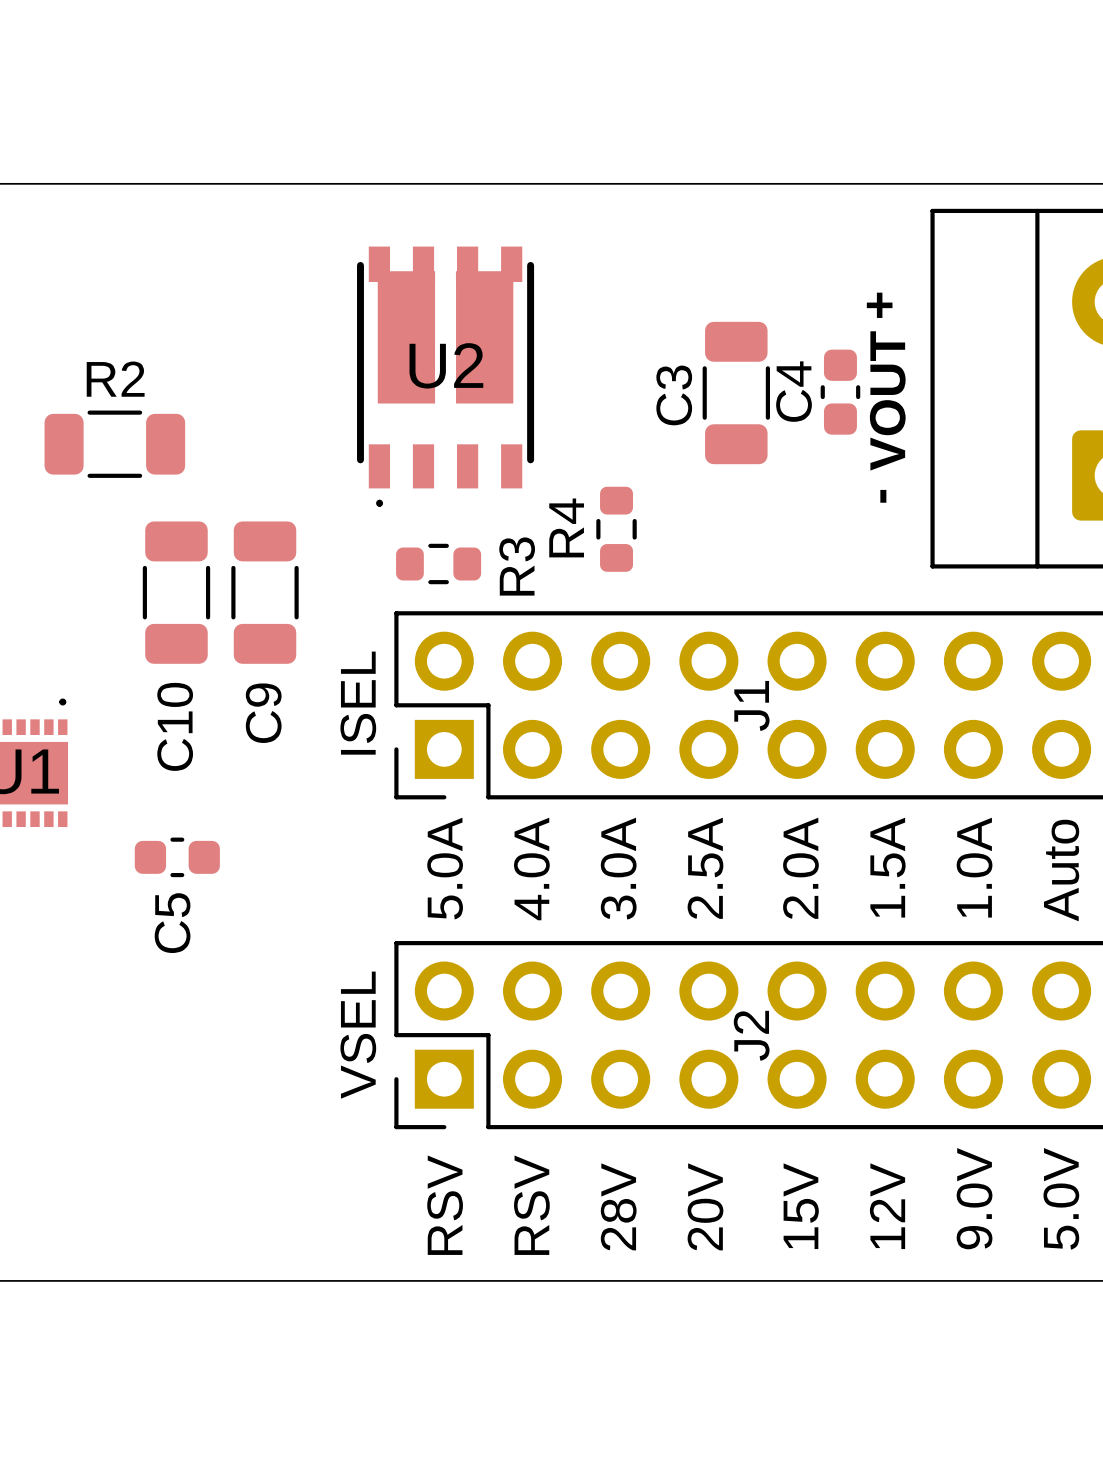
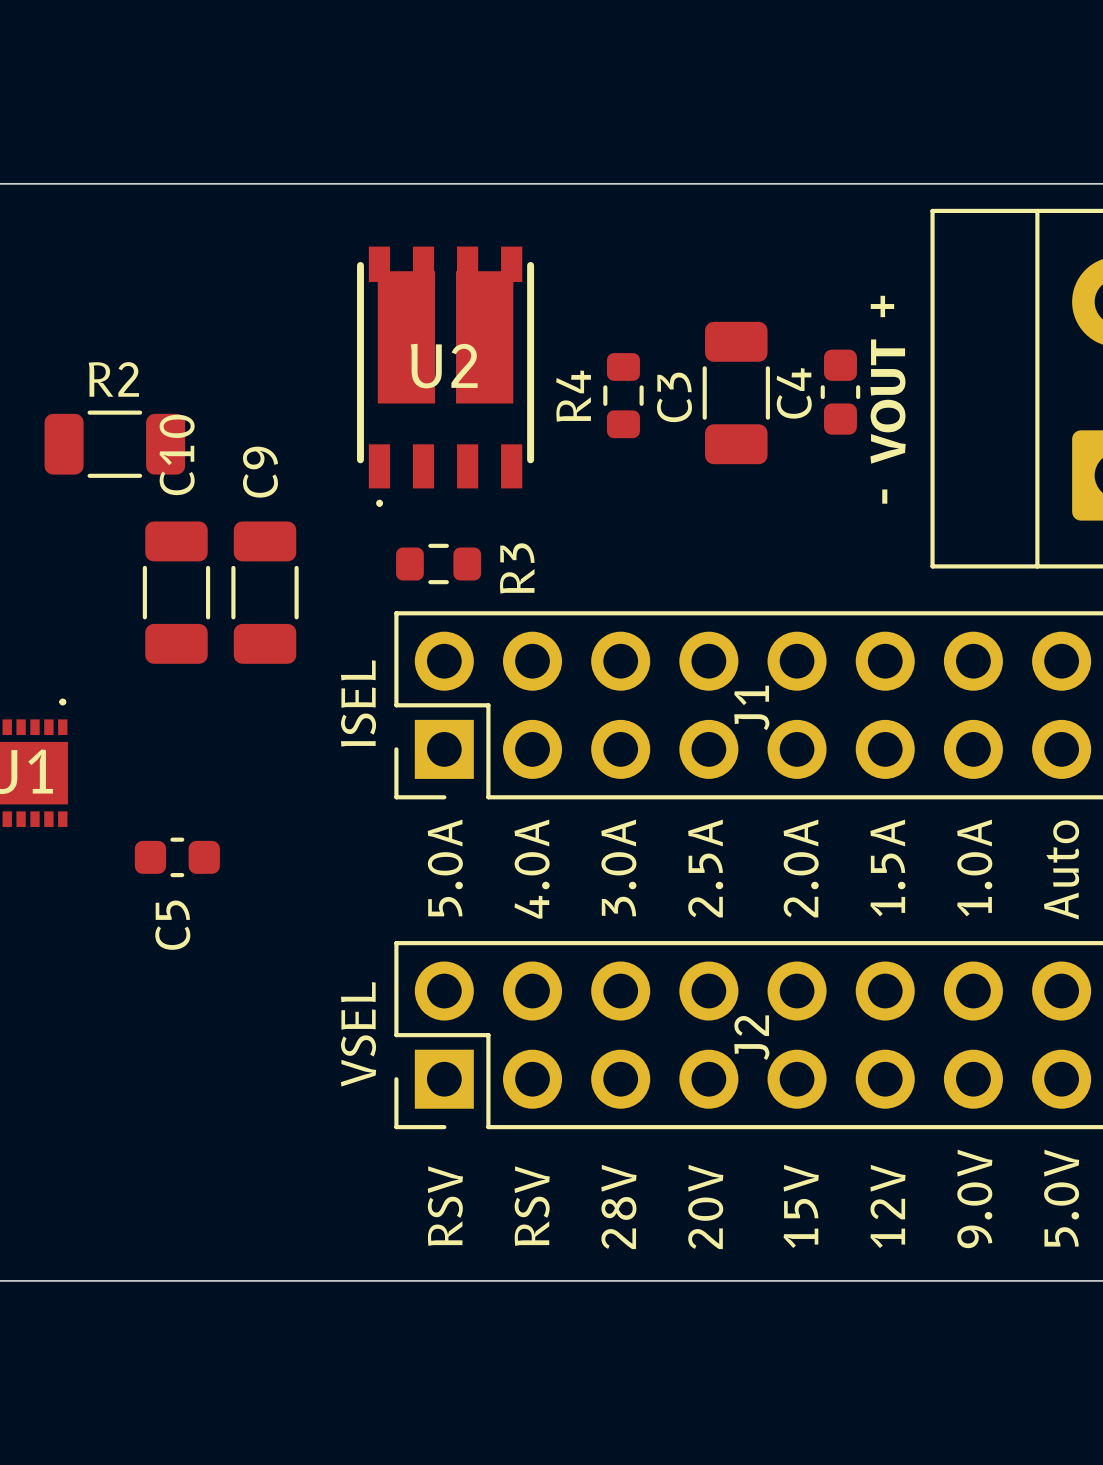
R4 position: (616, 529) -> (623, 395)
C9 name position: C9 (263, 713) -> C9 (260, 472)
C10 name position: C10 (175, 726) -> C10 (177, 454)

